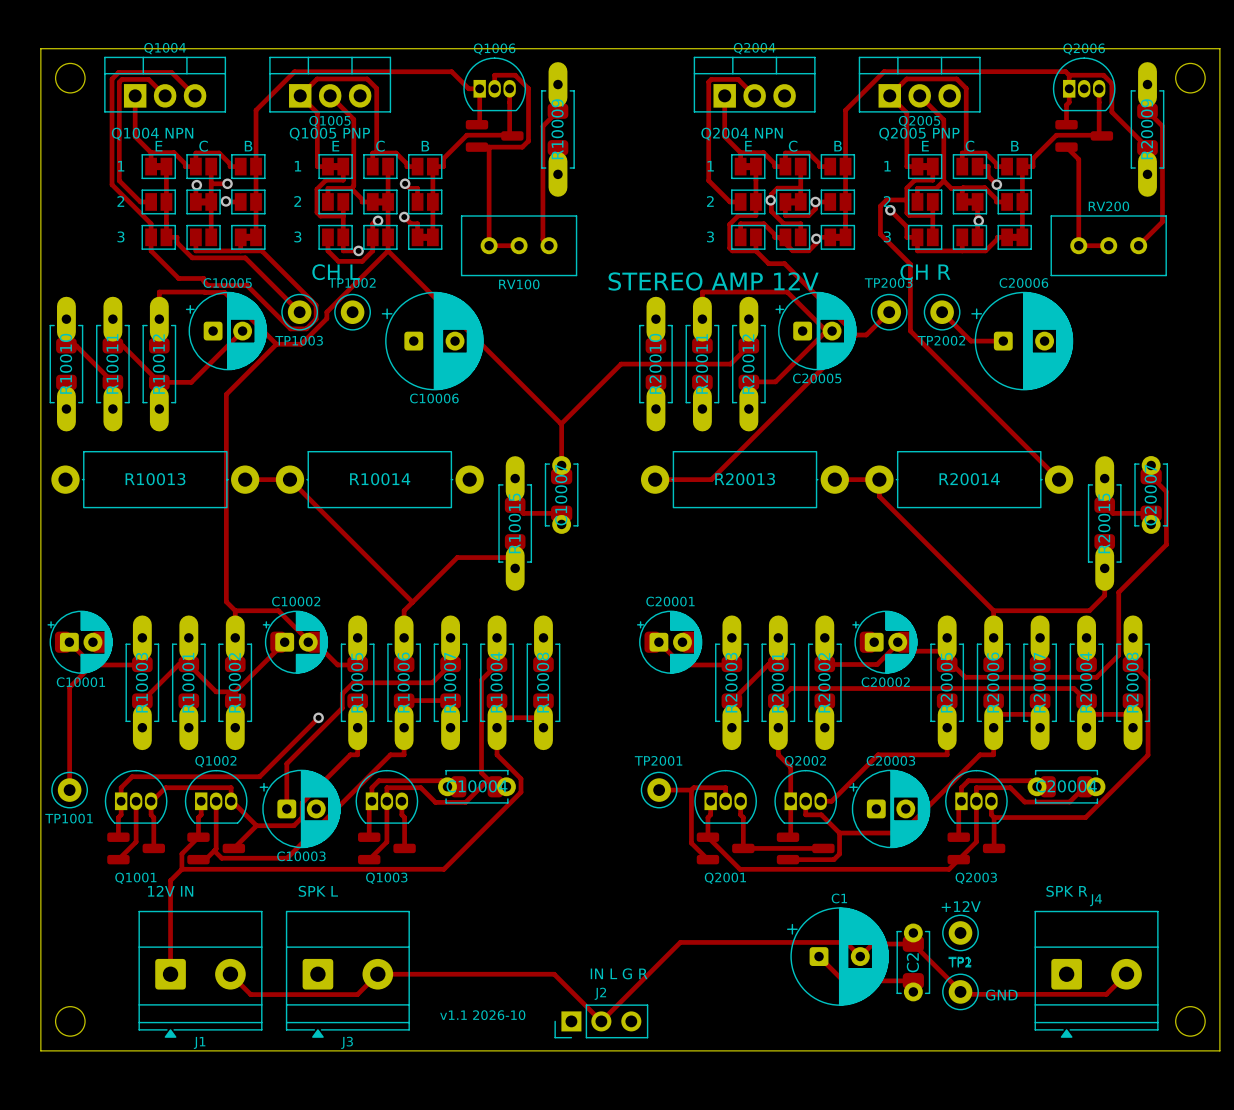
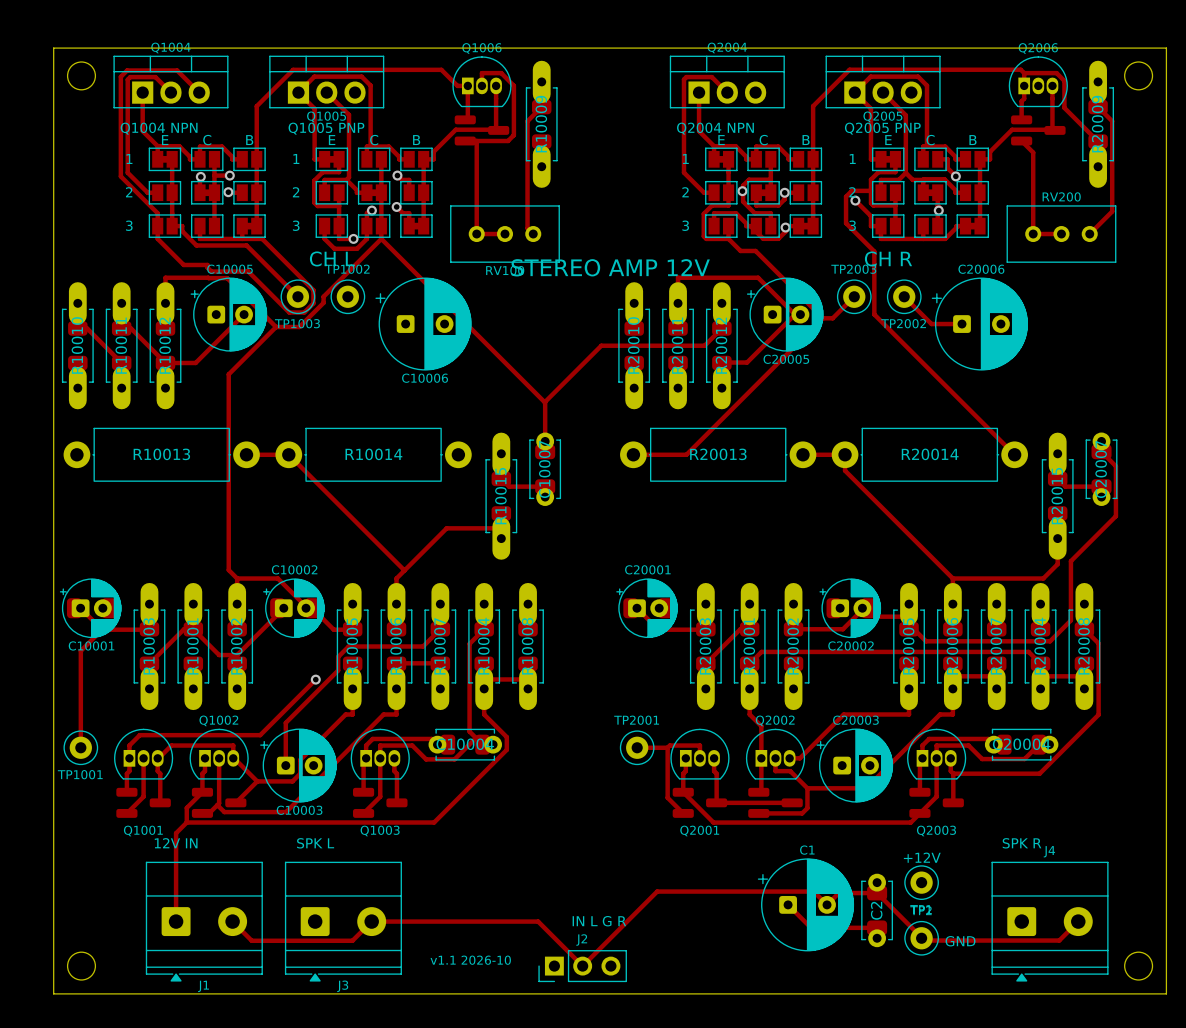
text position: STEREO AMP 12V (713, 281) -> STEREO AMP 12V (610, 267)

